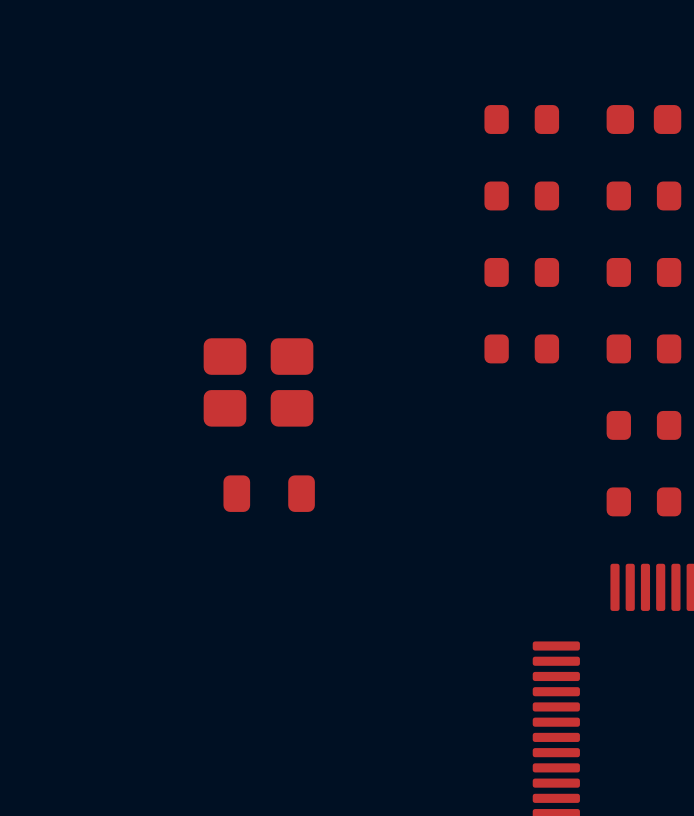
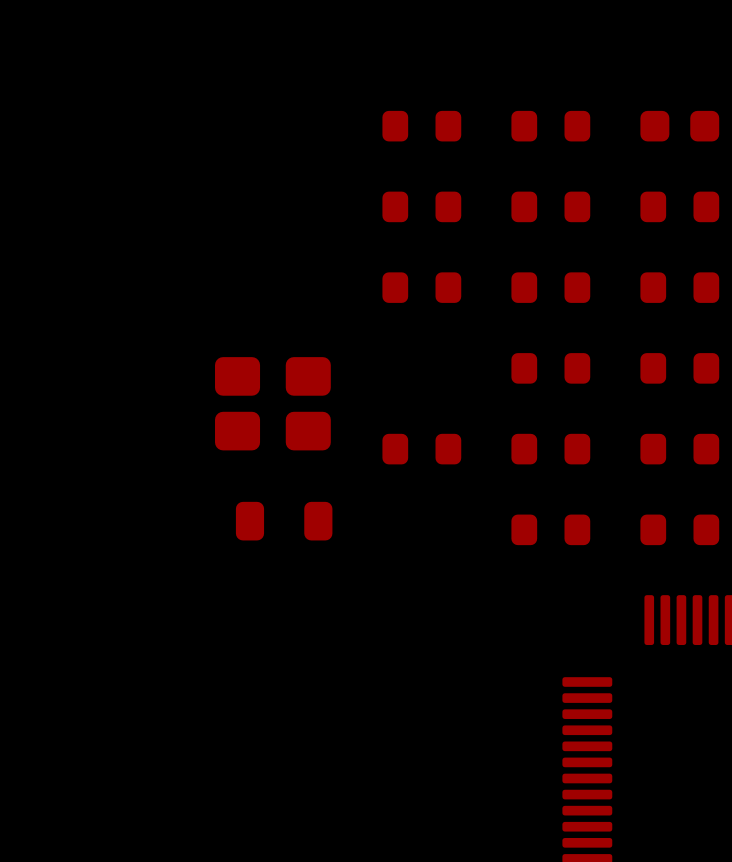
part: none -> (421, 126)
part: none -> (421, 206)
part: none -> (421, 287)
part: none -> (421, 449)
part: none -> (550, 449)
part: none -> (550, 529)

